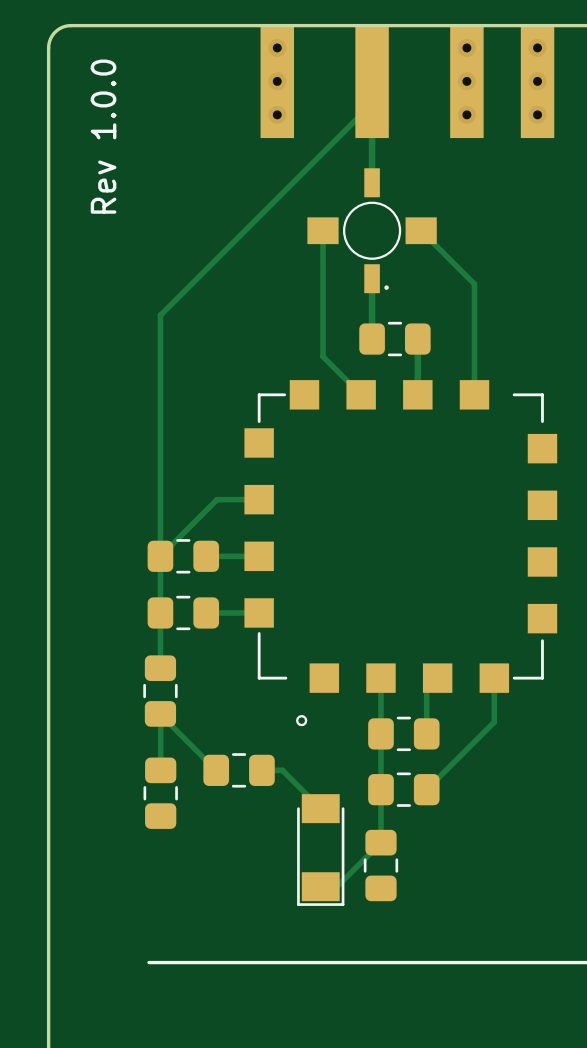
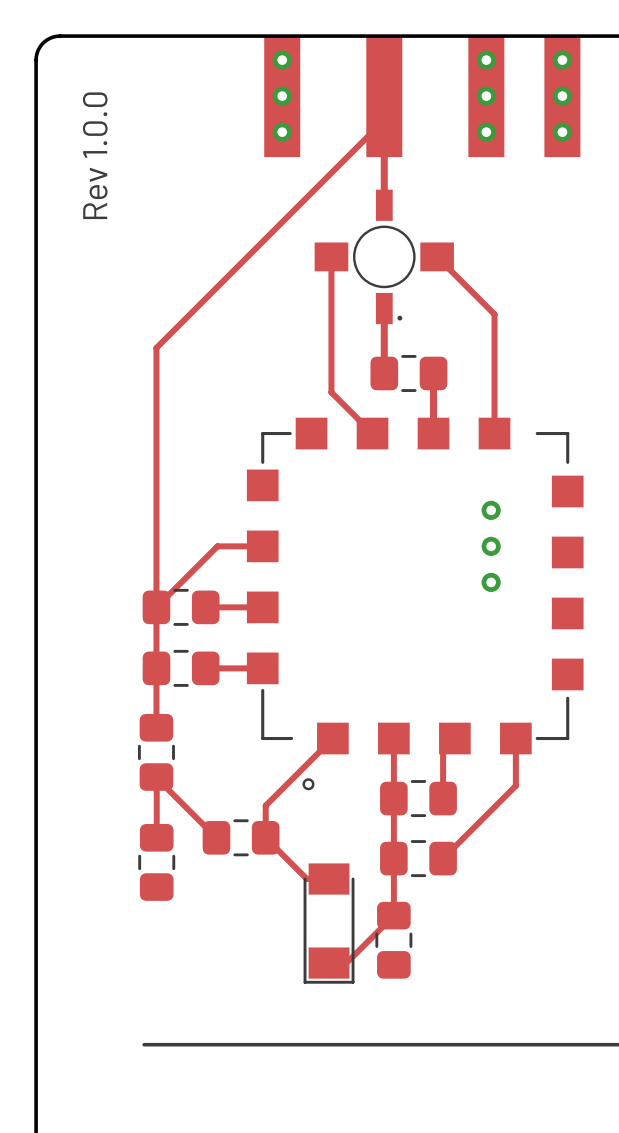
via: none -> (491, 510)
via: none -> (491, 546)
via: none -> (491, 582)
track: (261, 770) (282, 770) (320, 808) -> (332, 738) (265, 805) (265, 837) (306, 879) (329, 879)

